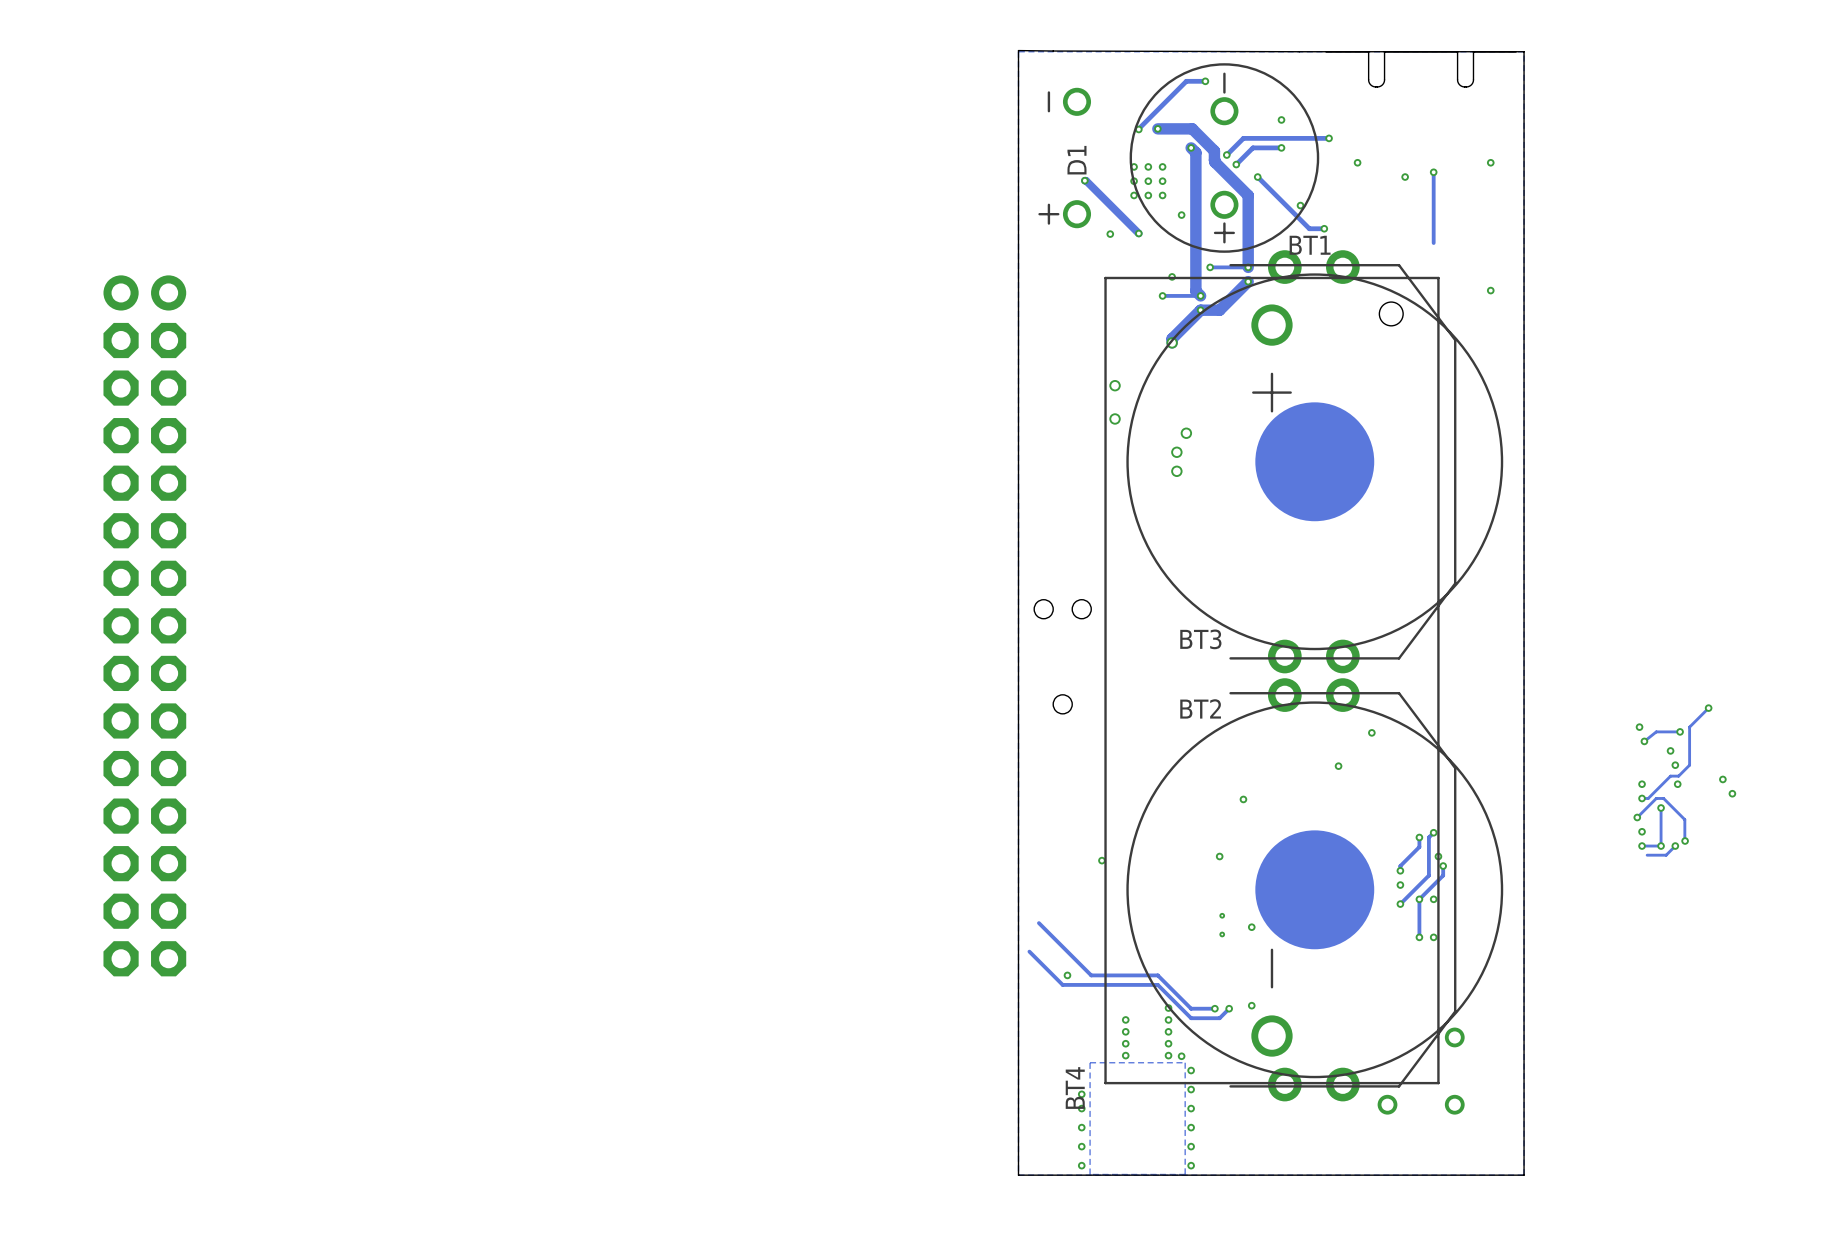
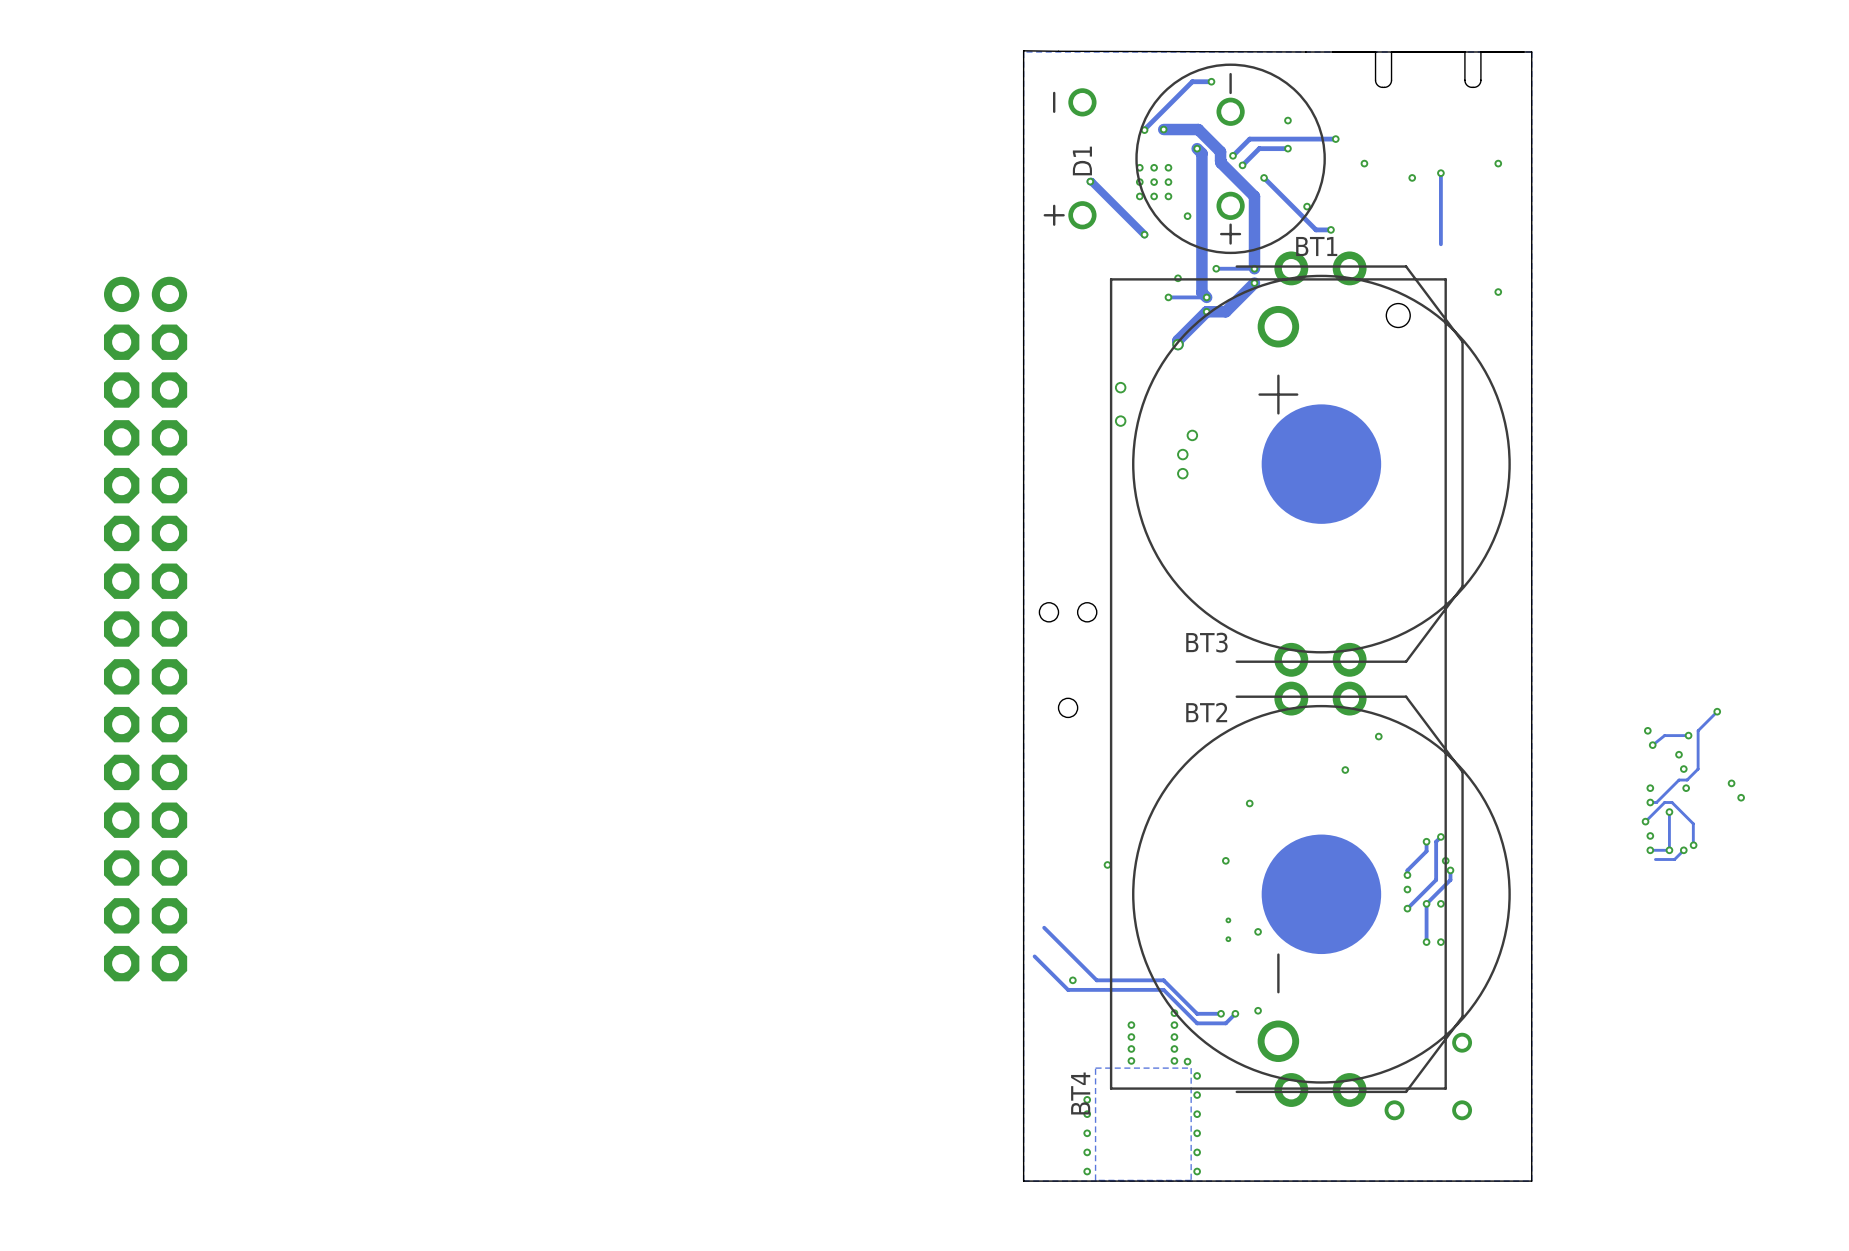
via: (1110, 234) -> none

